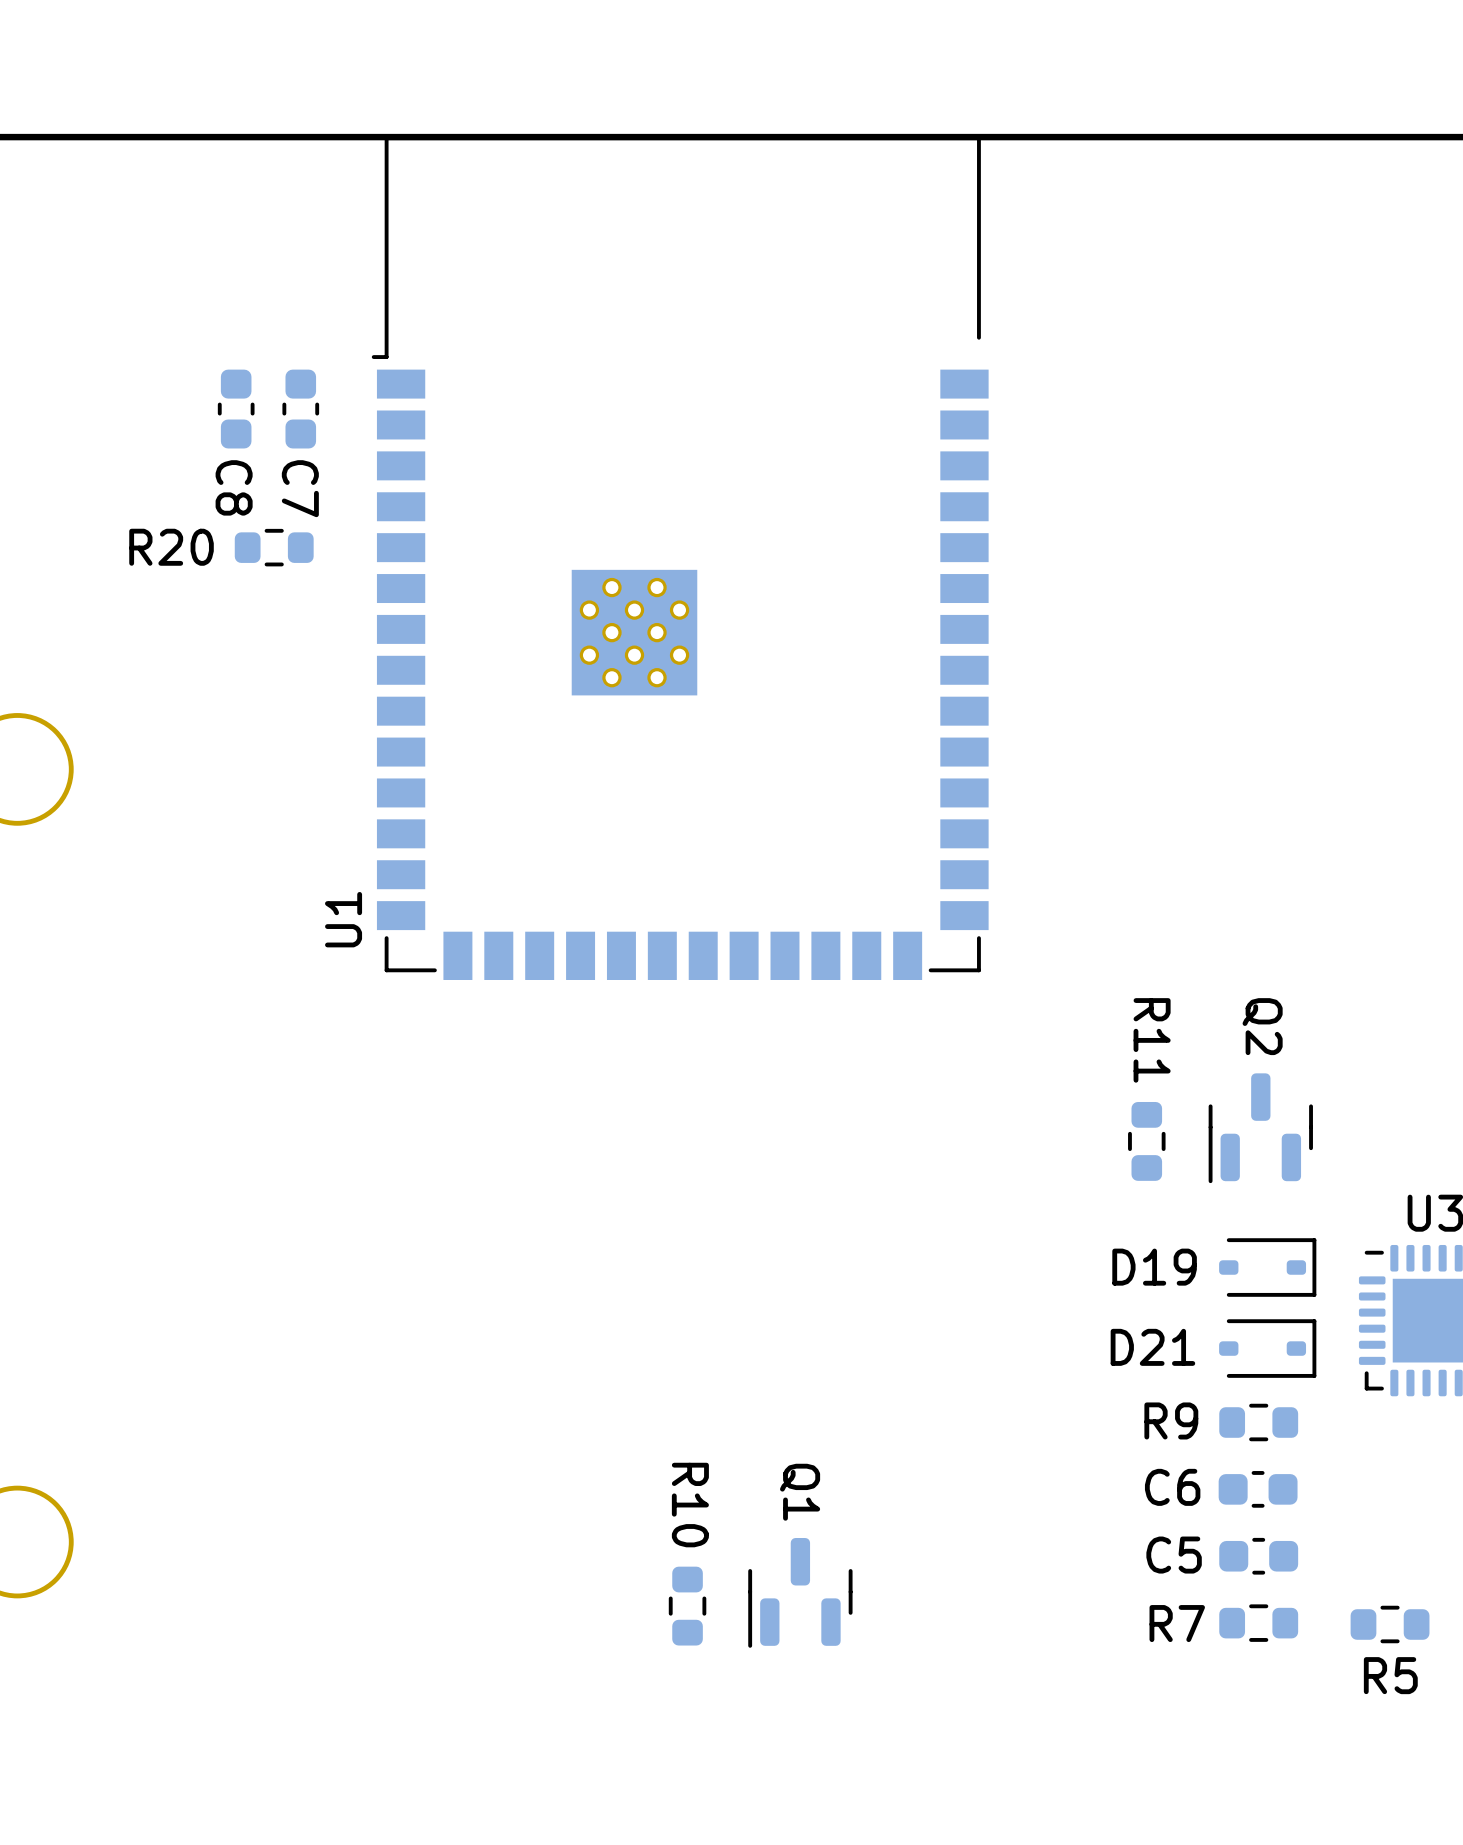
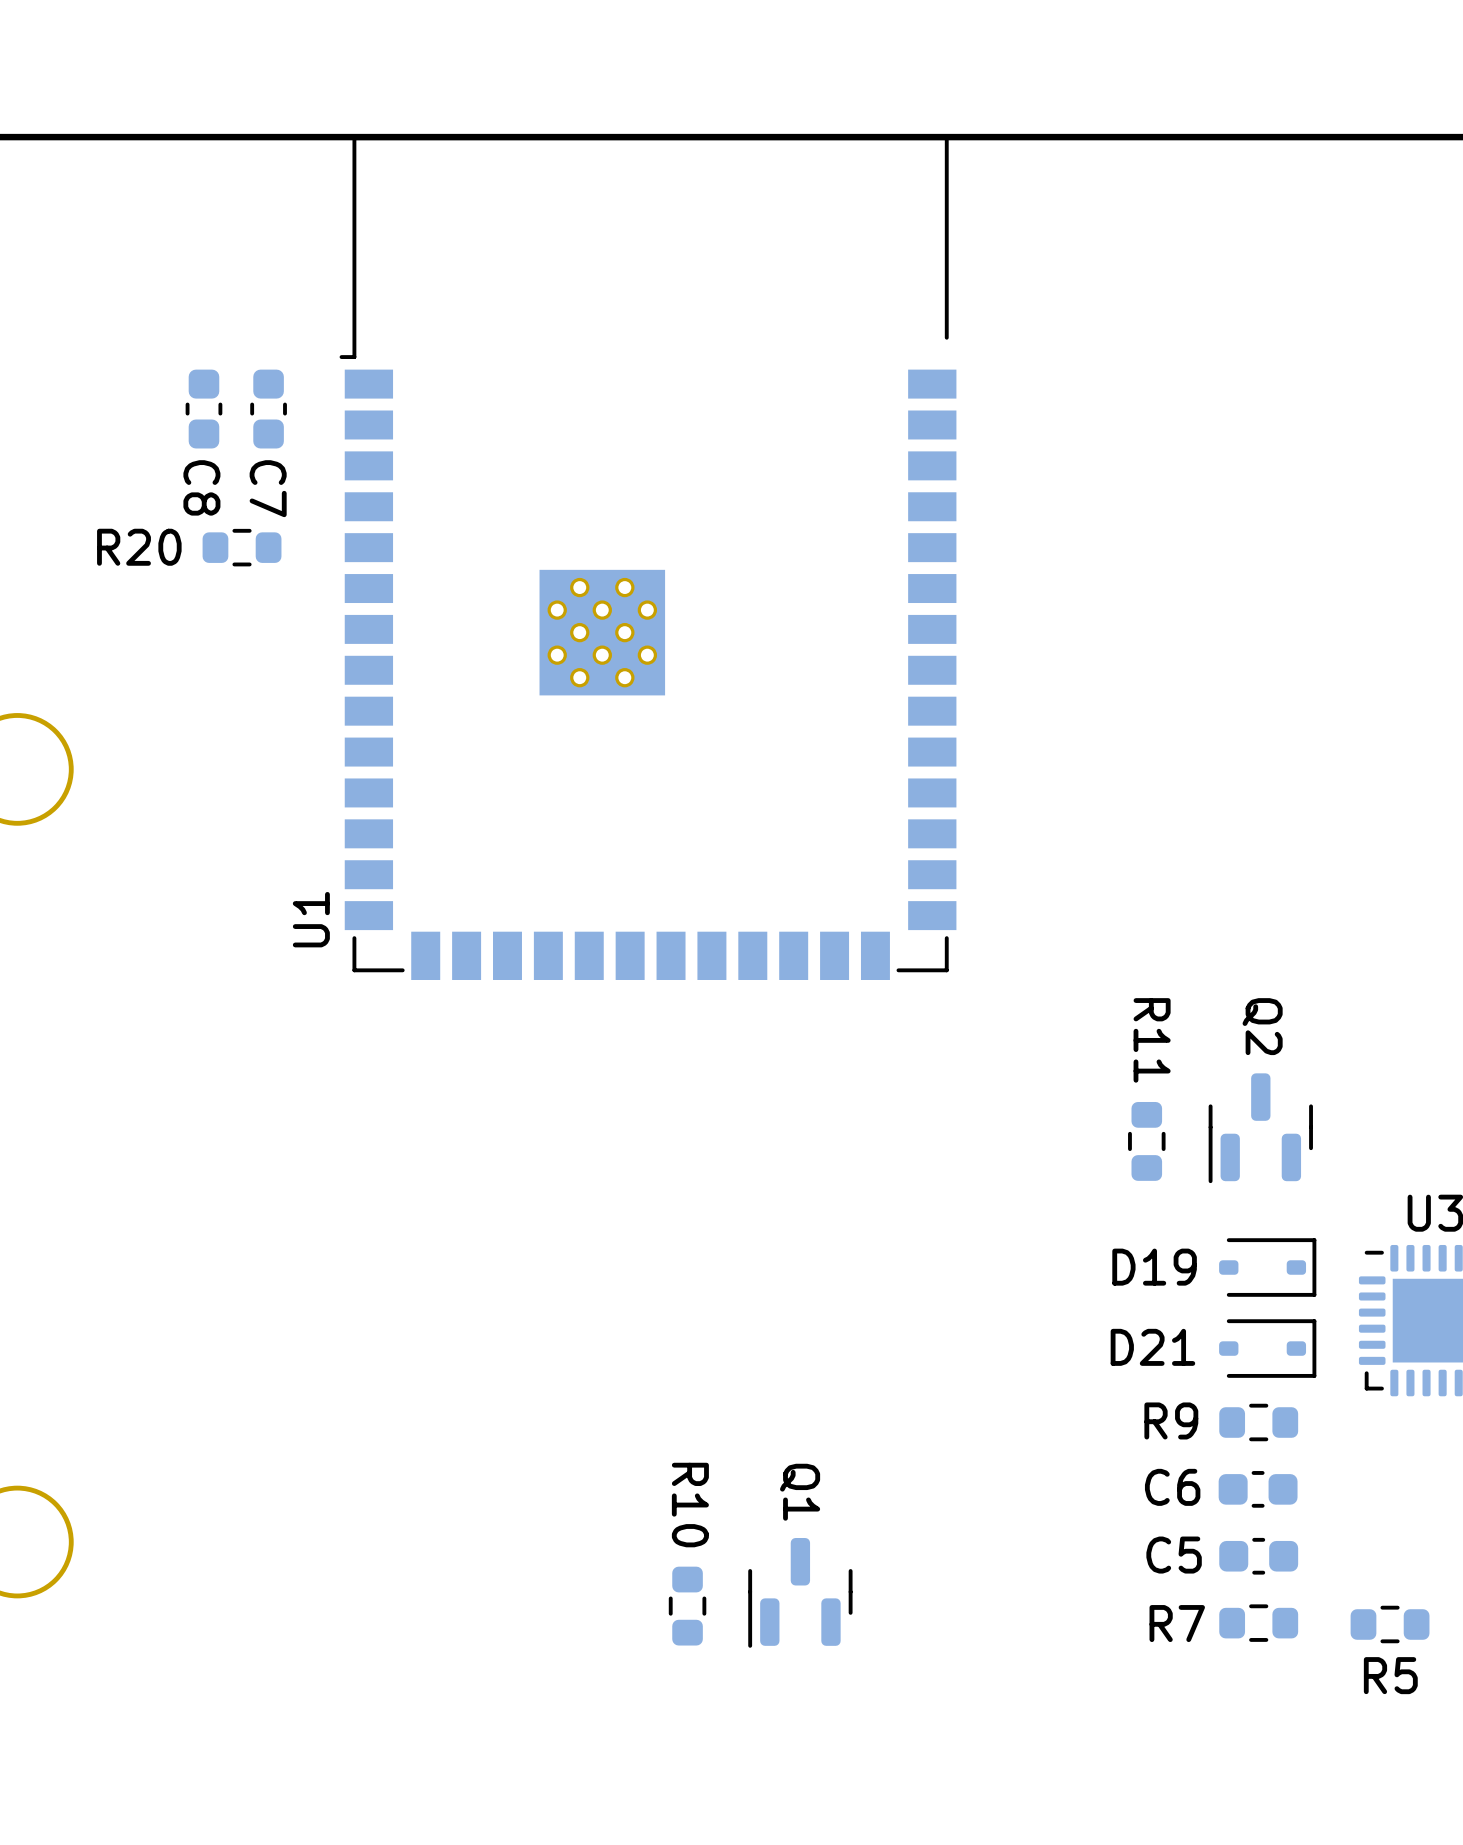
C8 position: (236, 409) -> (203, 409)
C7 position: (300, 409) -> (268, 409)
R20 position: (274, 547) -> (242, 547)
U1 position: (680, 558) -> (648, 558)

